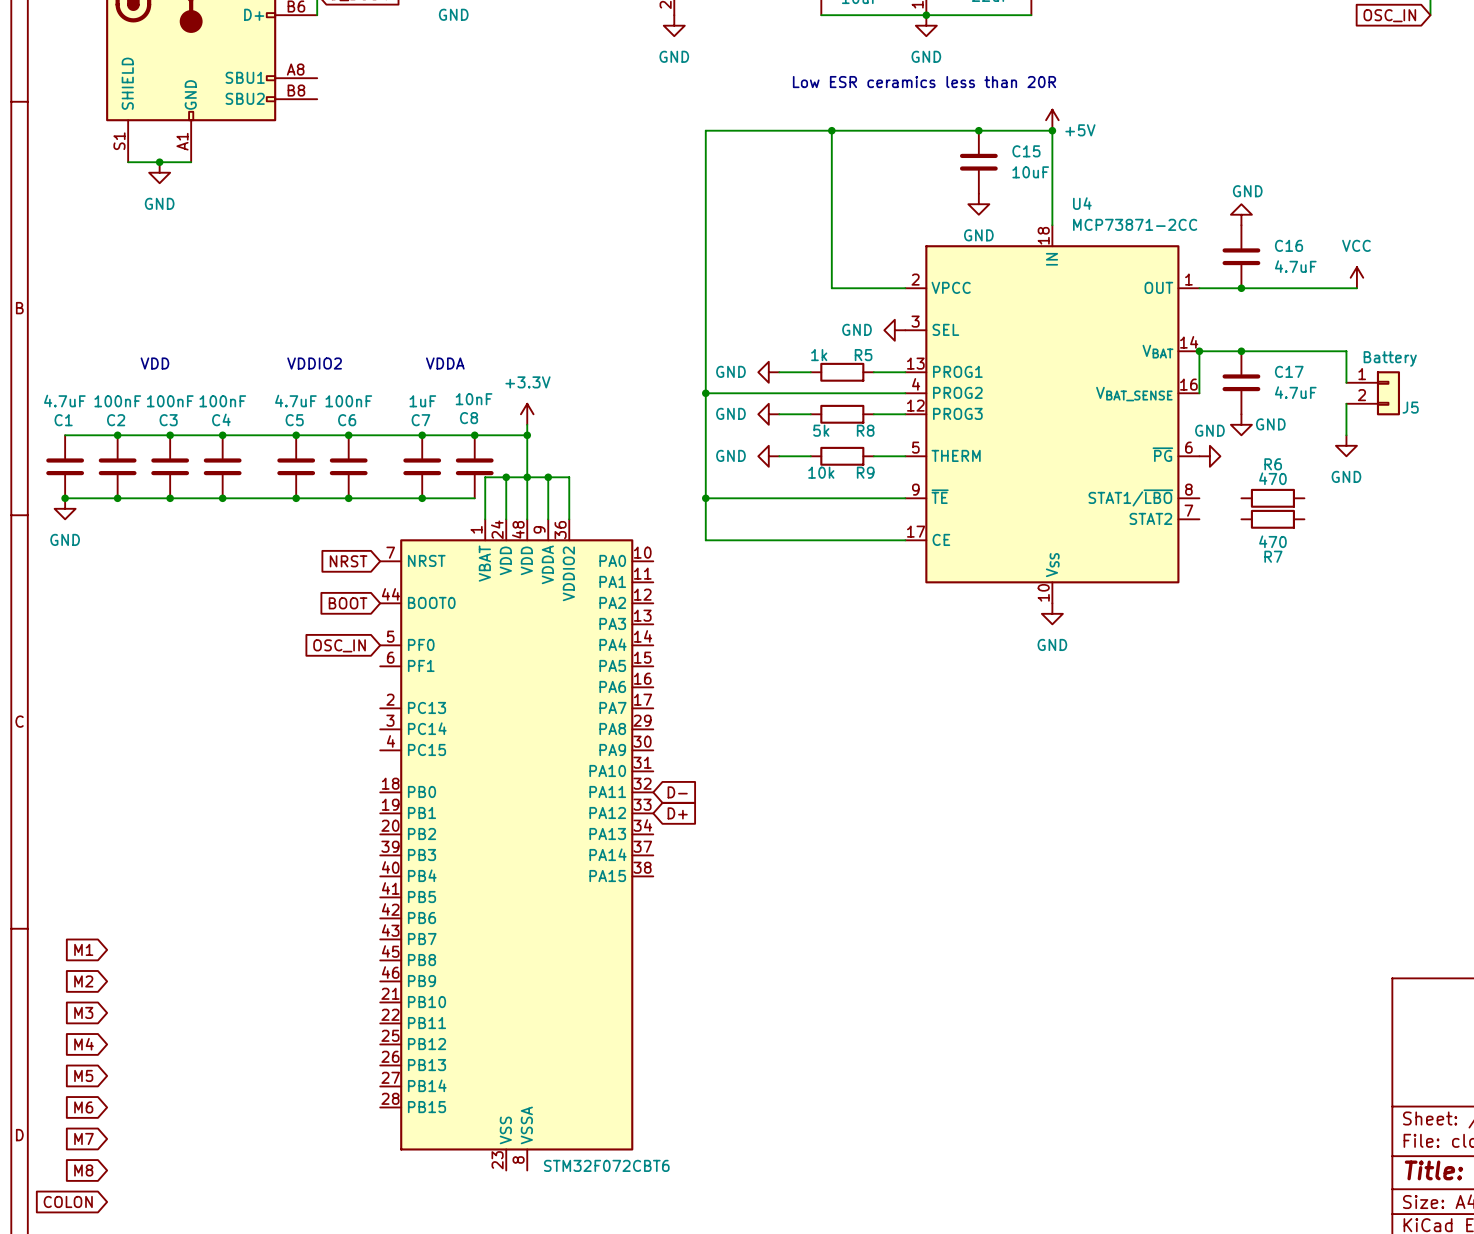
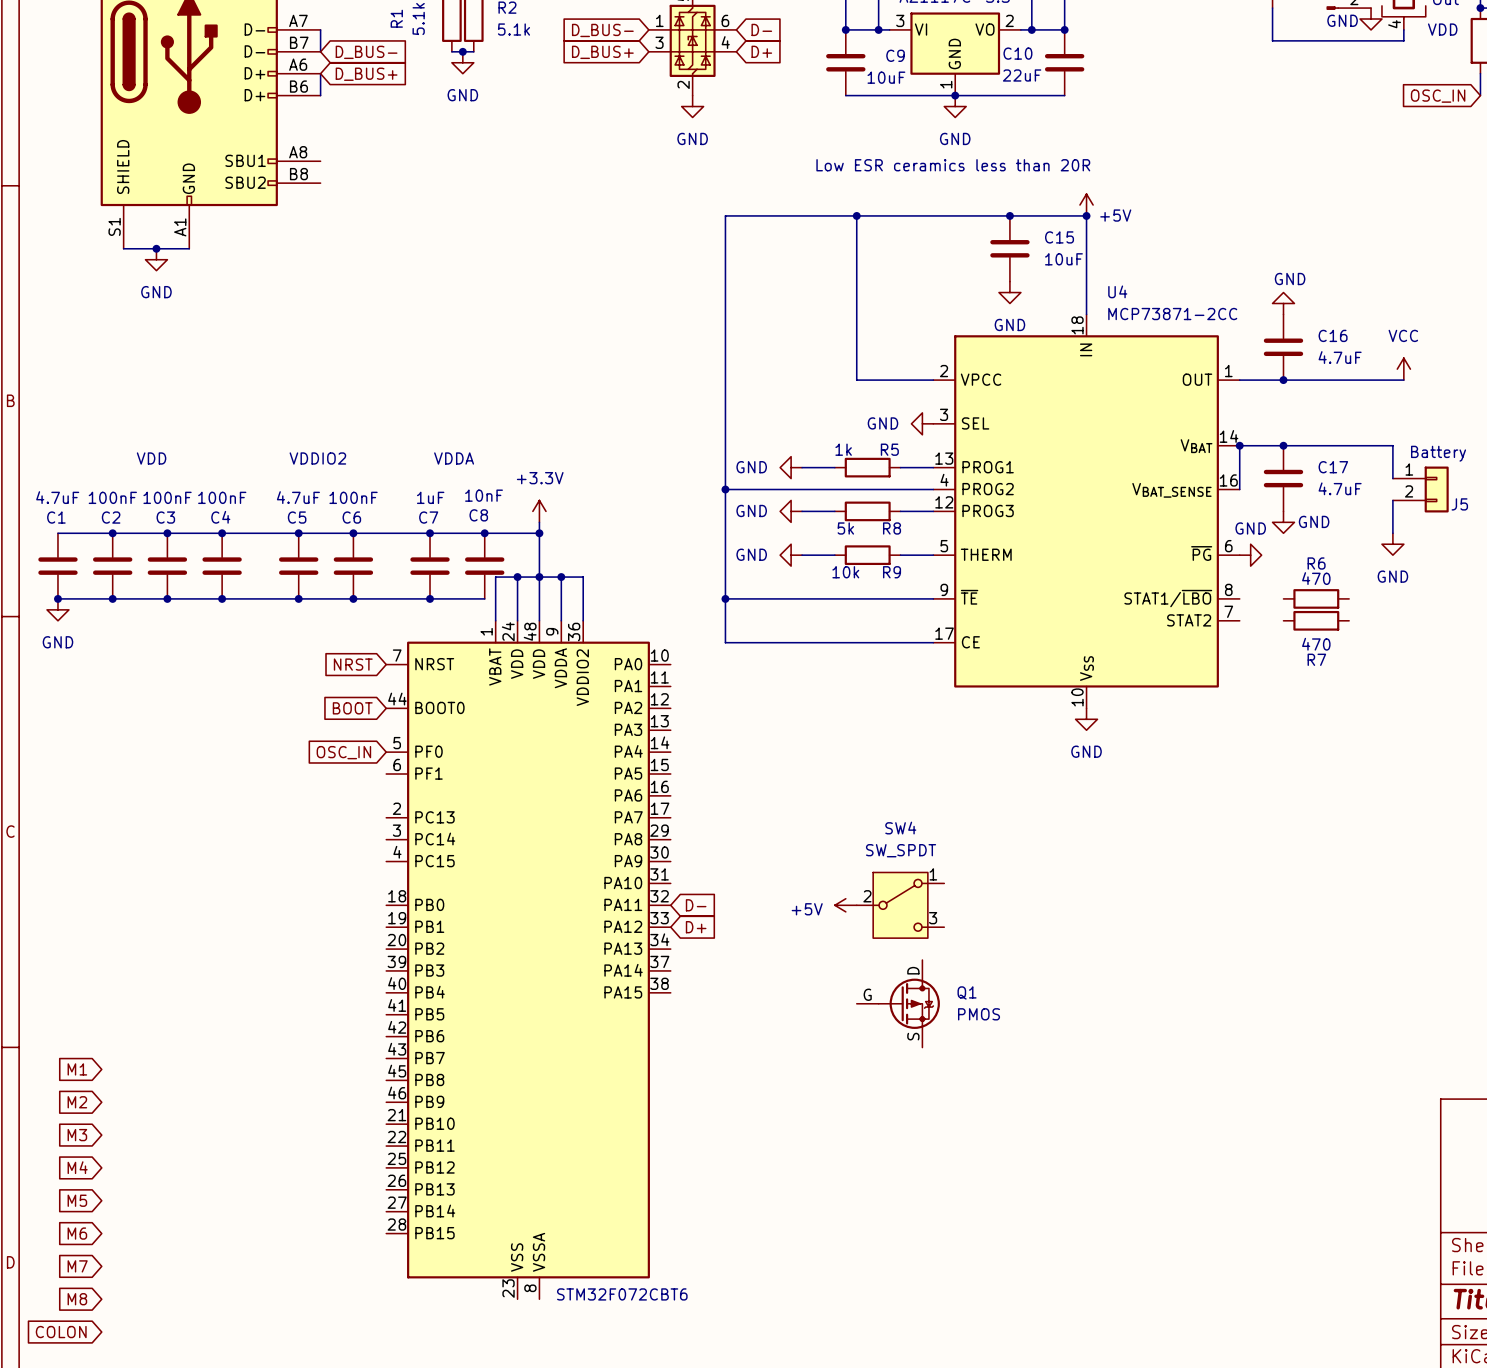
power symbol: none -> +5V (845, 905)
SW4: none -> SW_SPDT (900, 905)
Q1: none -> PMOS (898, 1003)

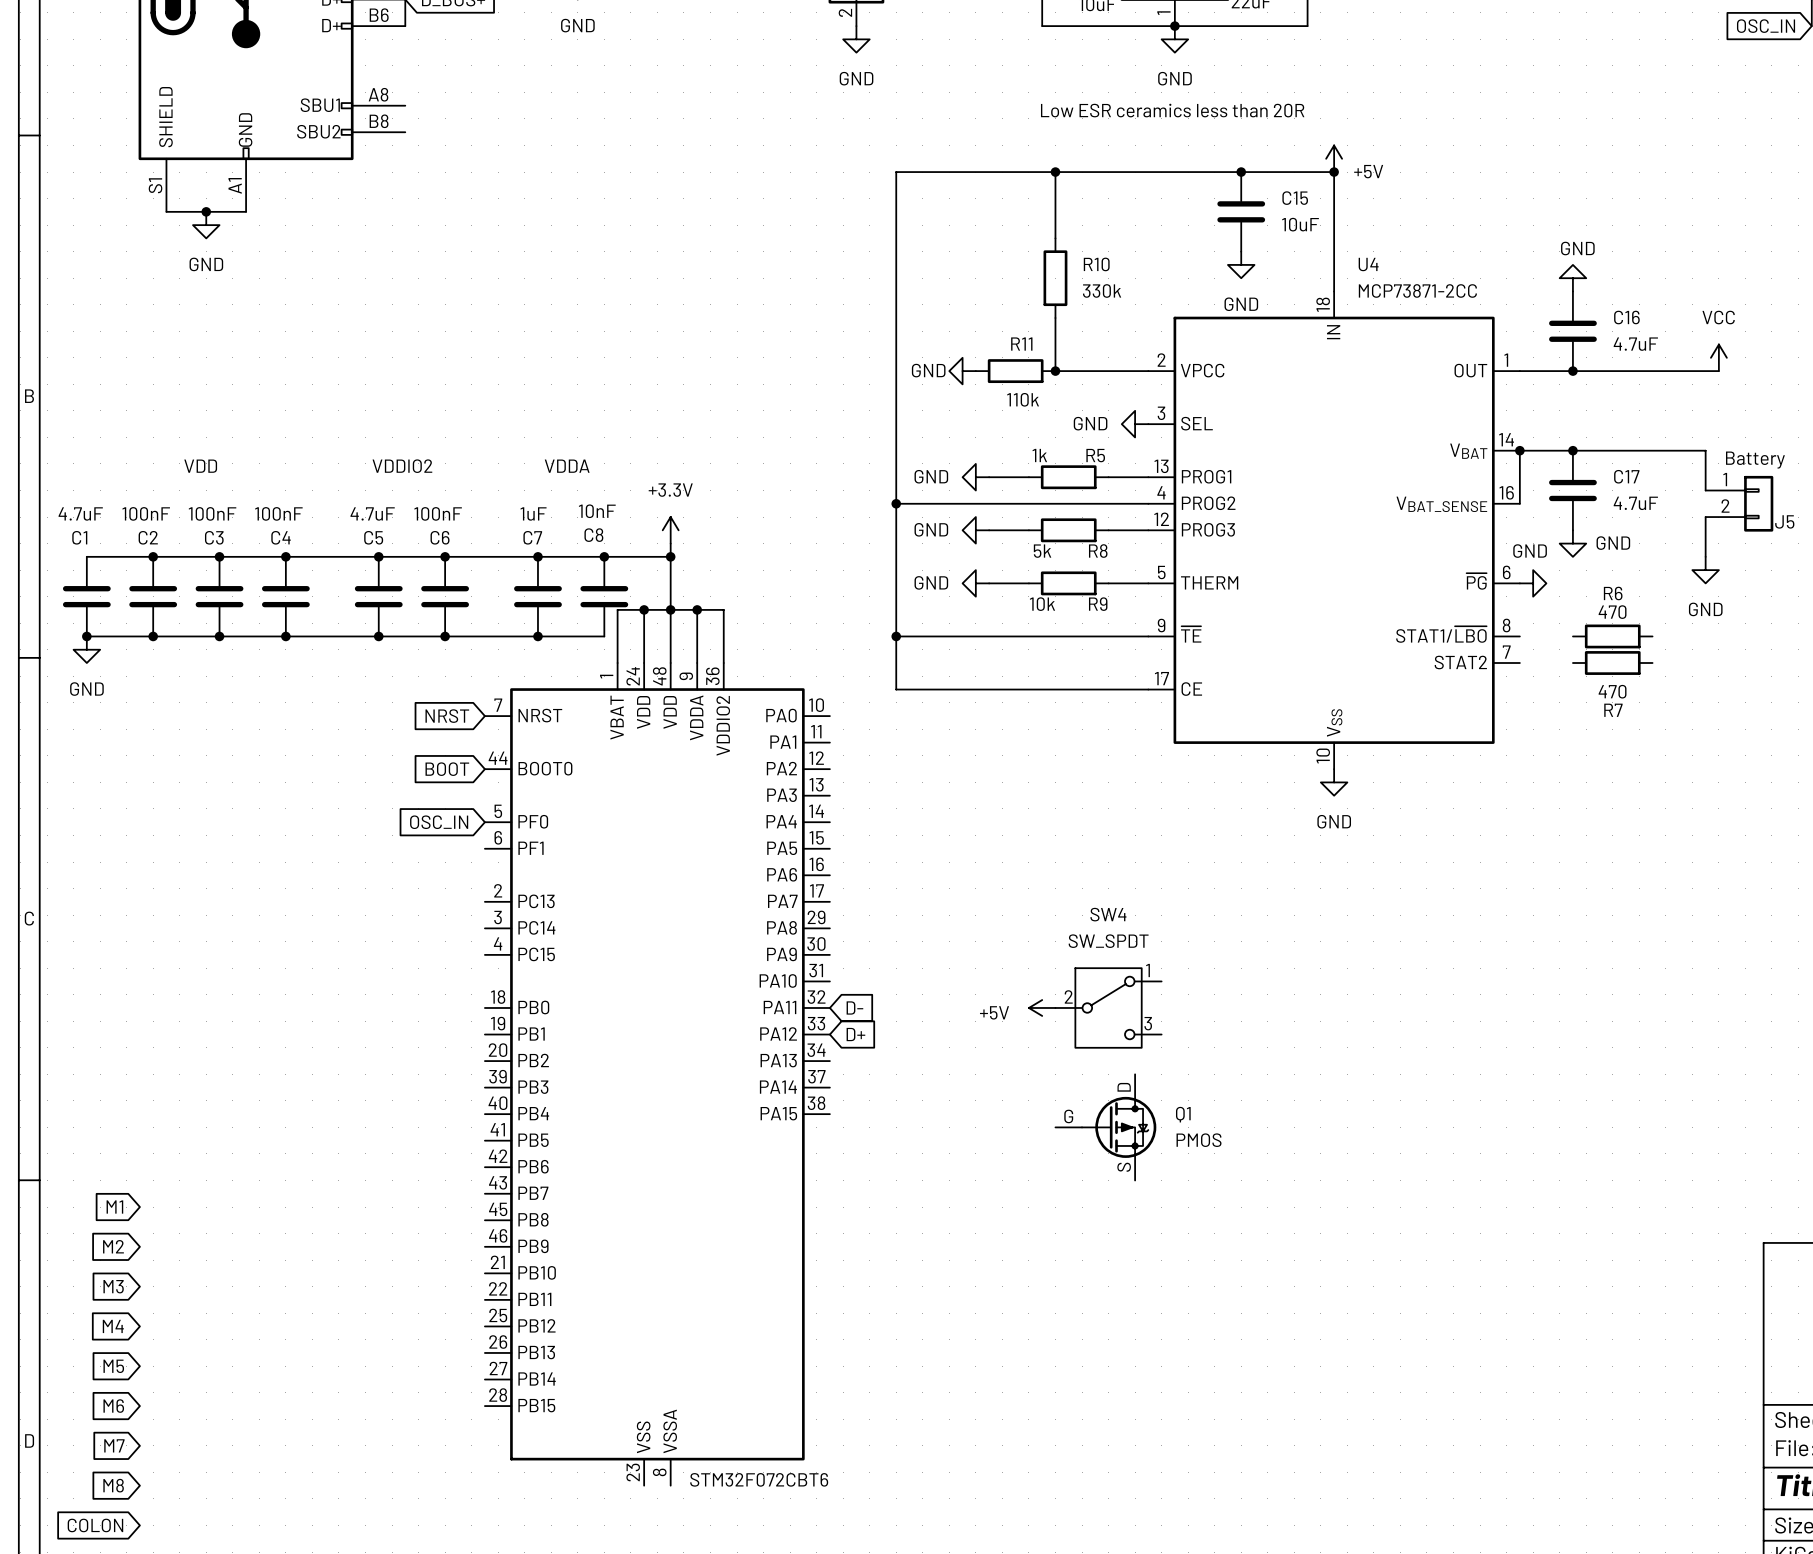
wire: (856, 270) (856, 336) -> none
R10: none -> 330k (1055, 278)
power symbol: none -> GND (962, 371)
R11: none -> 110k (1015, 371)
junction: none -> (1055, 371)

